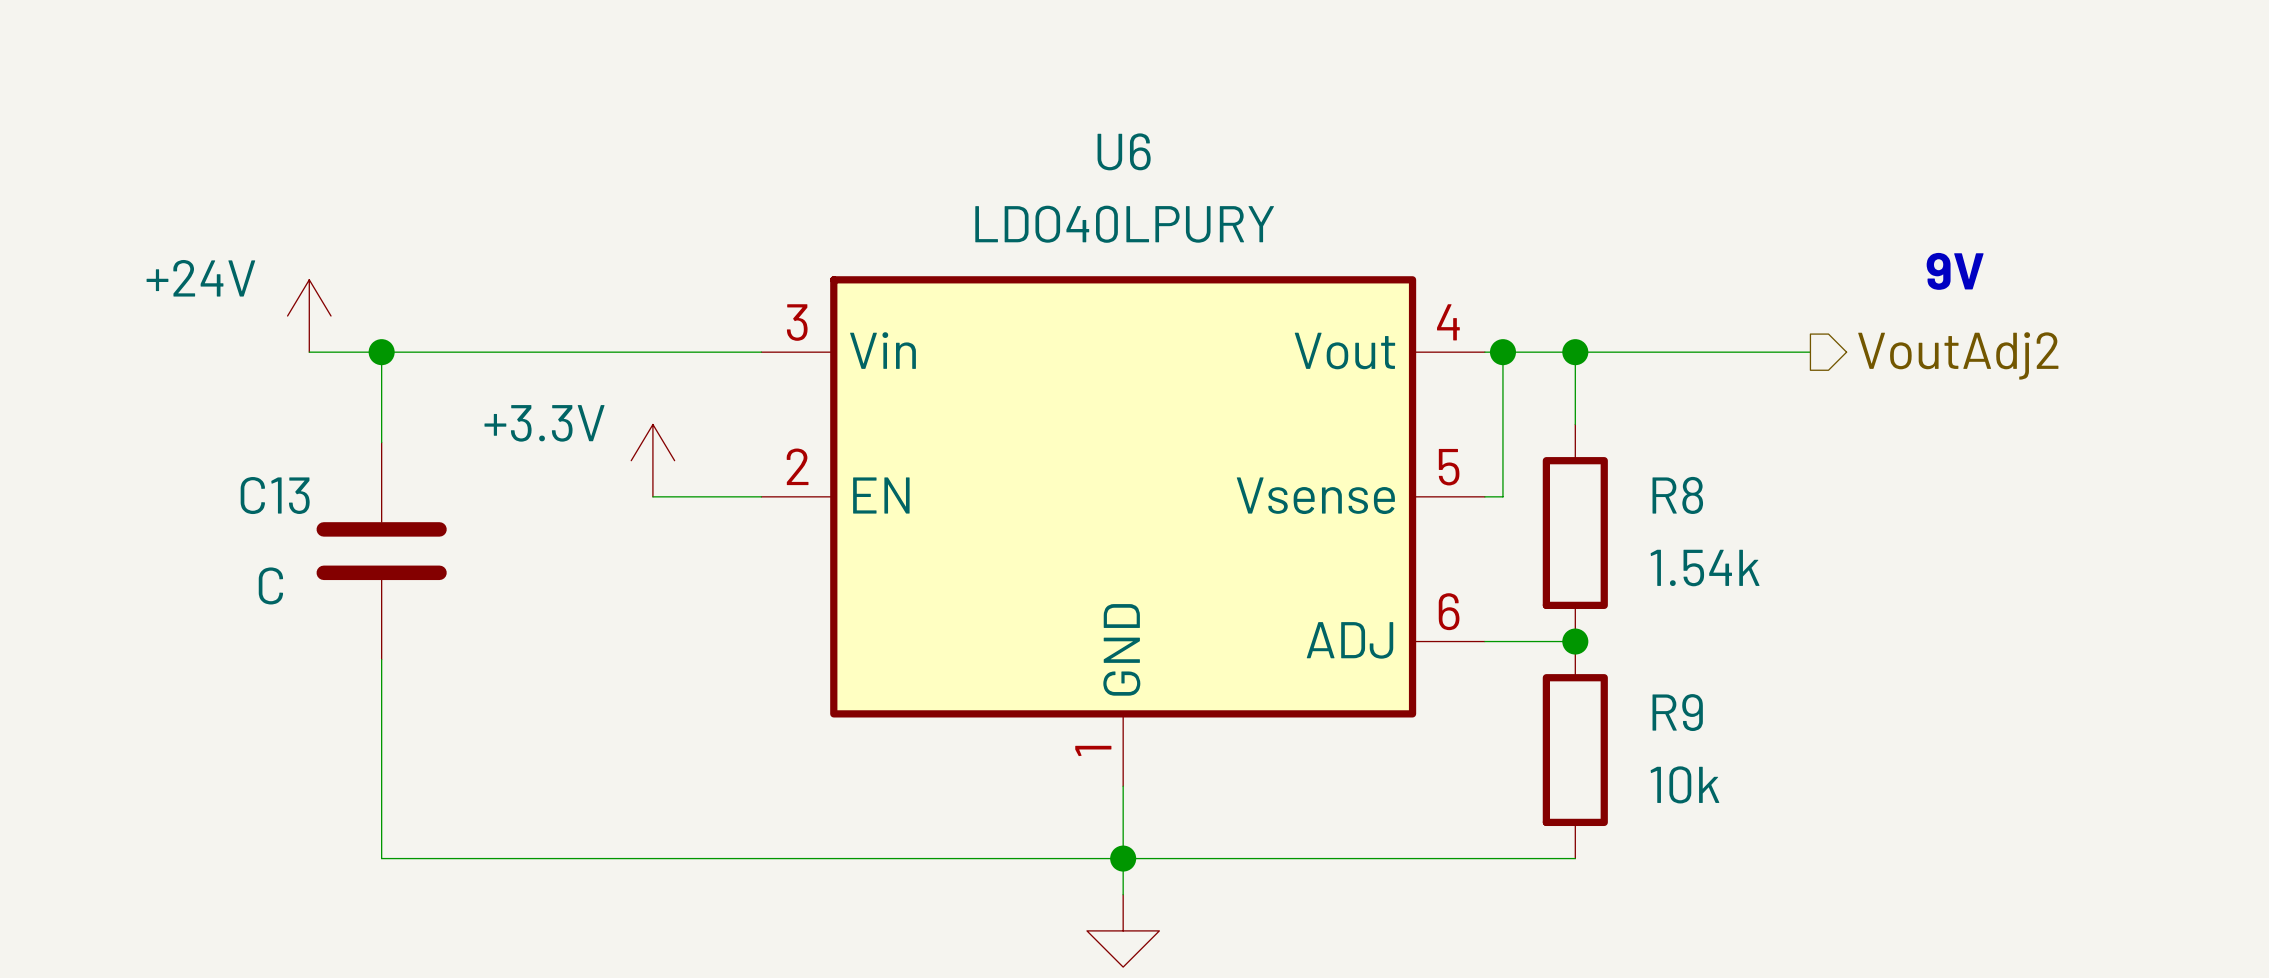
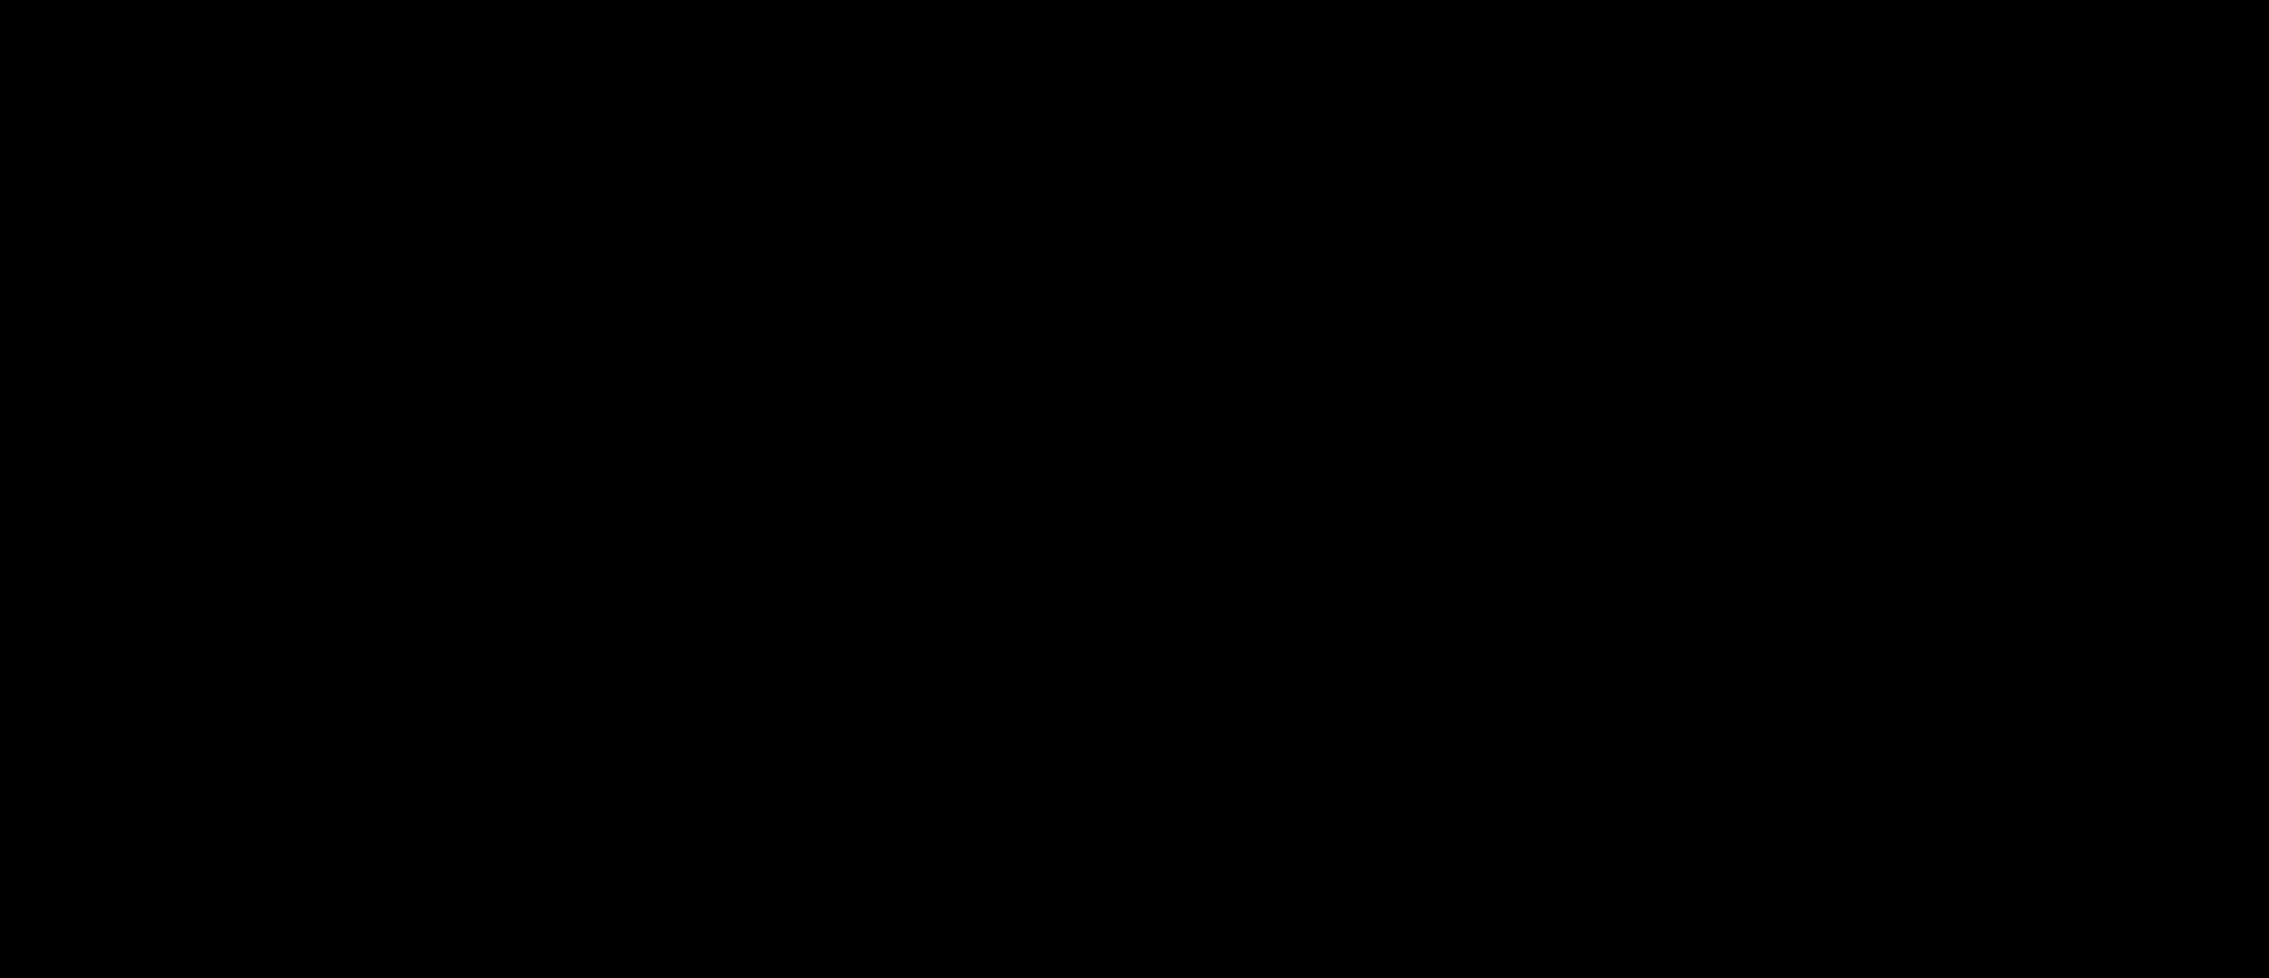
text: 9V (1955, 271) -> none
power symbol: +24V (309, 315) -> none
wire: (309, 352) (761, 352) -> none
wire: (381, 352) (381, 442) -> none
junction: (381, 352) -> none
wire: (1484, 352) (1810, 352) -> none
wire: (1502, 352) (1502, 496) (1484, 496) -> none
junction: (1502, 352) -> none
wire: (1575, 352) (1575, 424) -> none
junction: (1575, 352) -> none
hierarchical label: VoutAdj2 (1958, 355) -> none
power symbol: +3.3V (652, 460) -> none
wire: (652, 496) (761, 496) -> none
U6: LDO40LPURY (1123, 531) -> none
R8: 1.54k (1575, 533) -> none
C13: C (381, 551) -> none
wire: (1484, 641) (1575, 641) -> none
junction: (1575, 641) -> none
wire: (381, 659) (381, 858) (1575, 858) -> none
R9: 10k (1575, 750) -> none
wire: (1123, 786) (1123, 894) -> none
junction: (1123, 858) -> none
power symbol: (1123, 930) -> none

